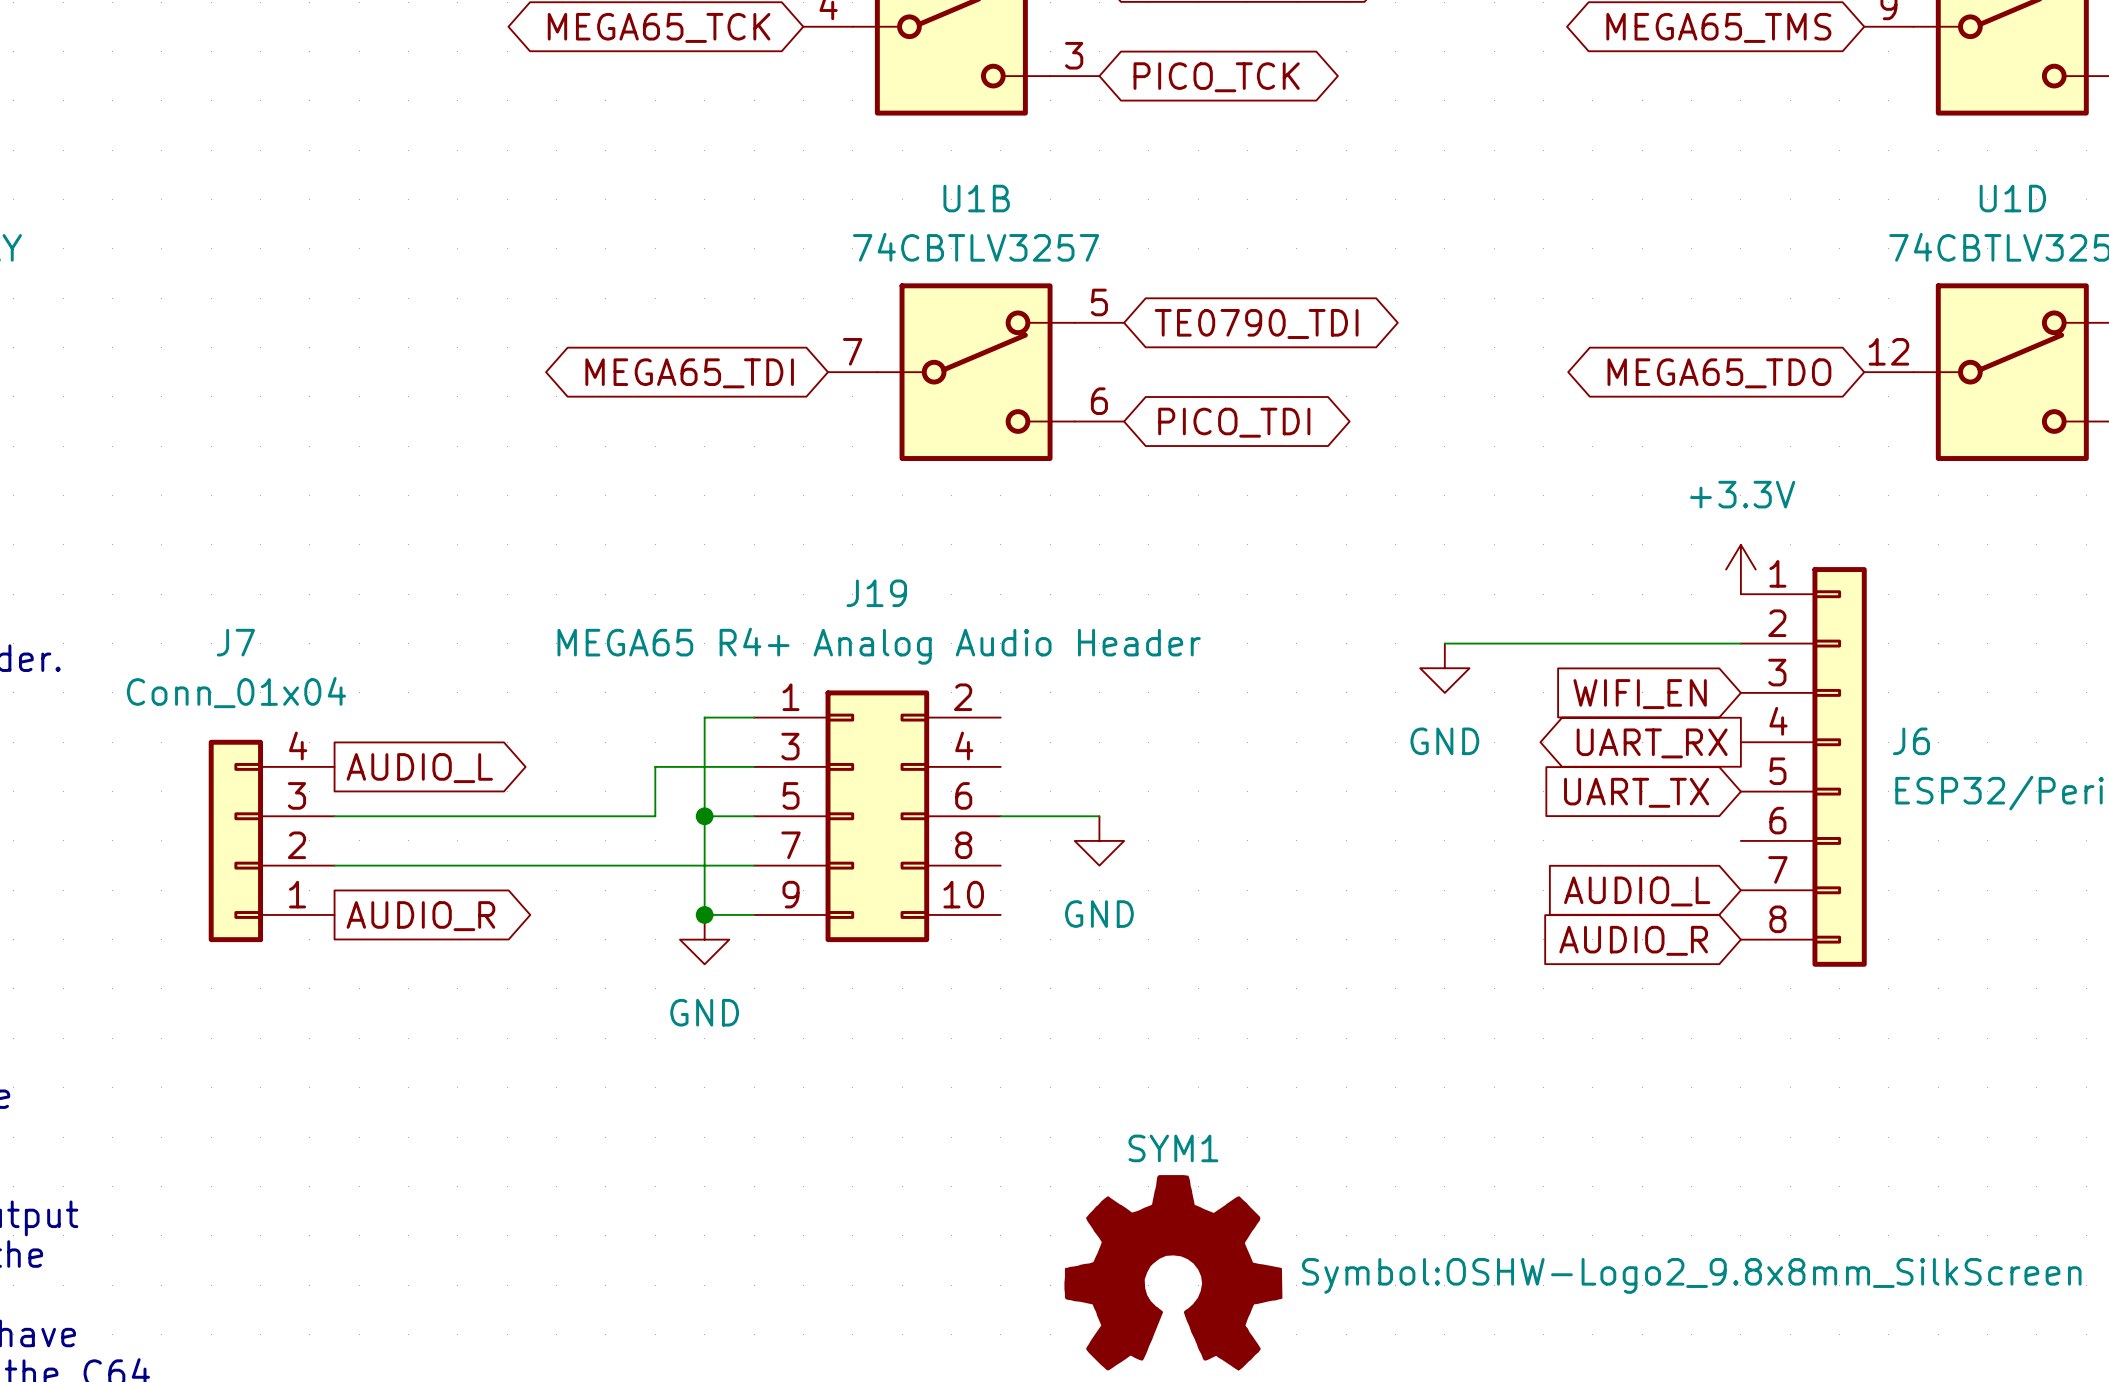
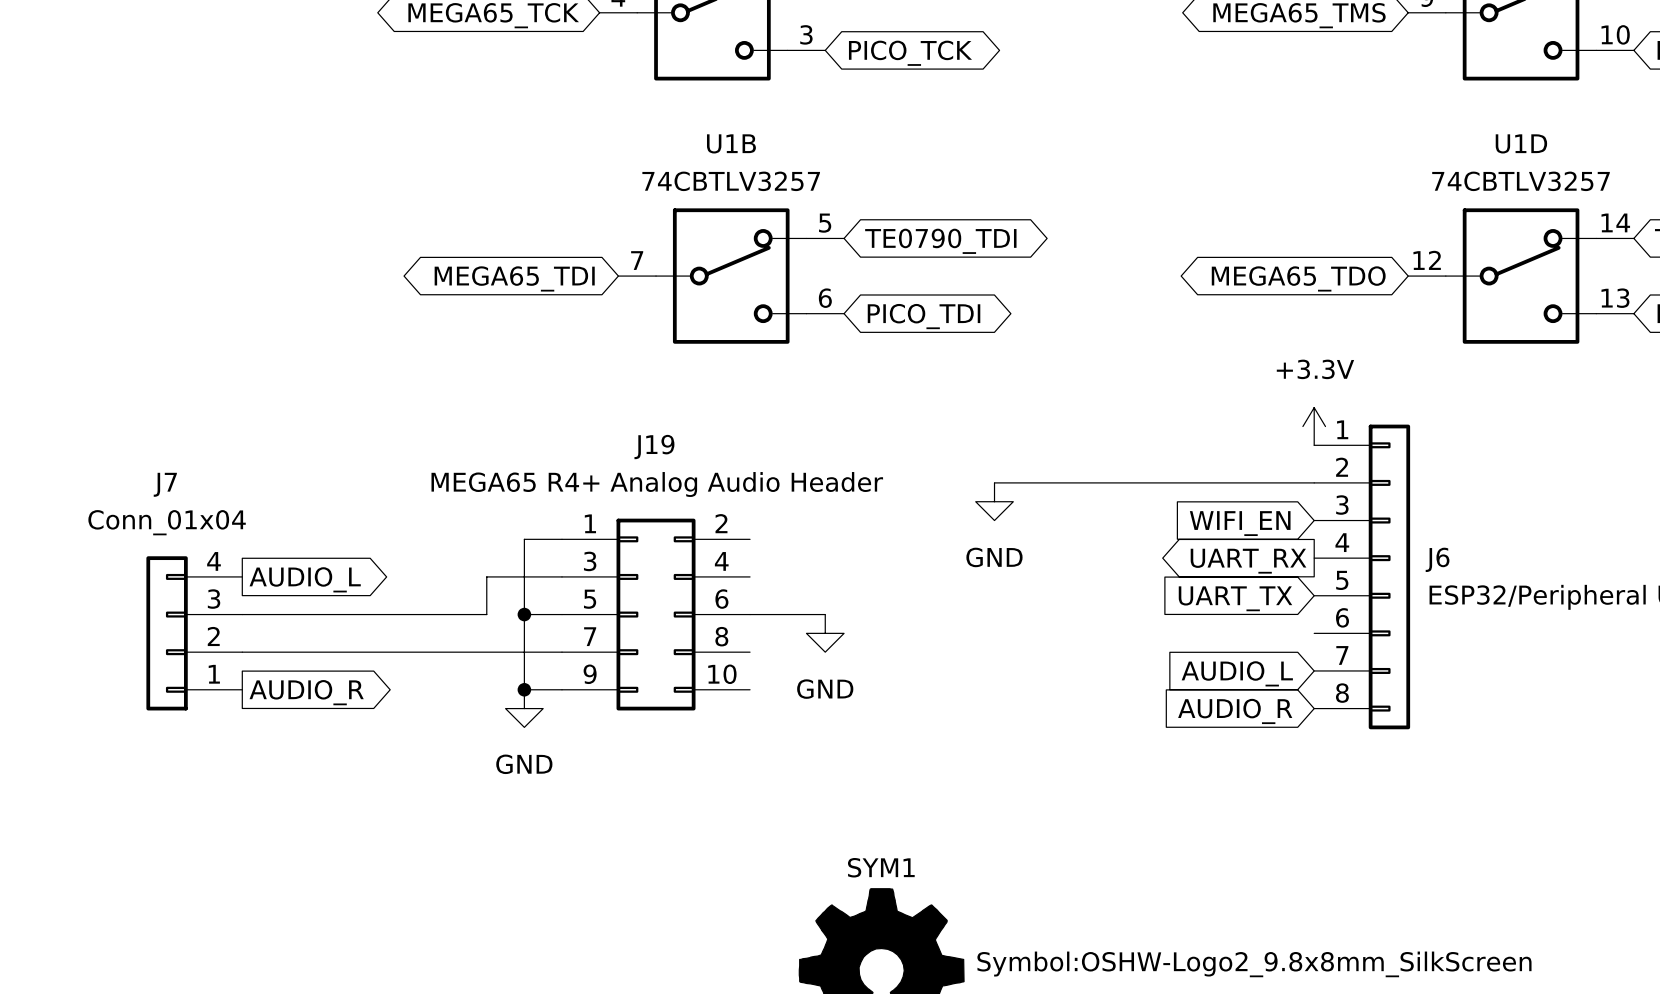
wire: none -> (994, 482) (1088, 482)
power symbol position: GND (1444, 668) -> GND (994, 501)

